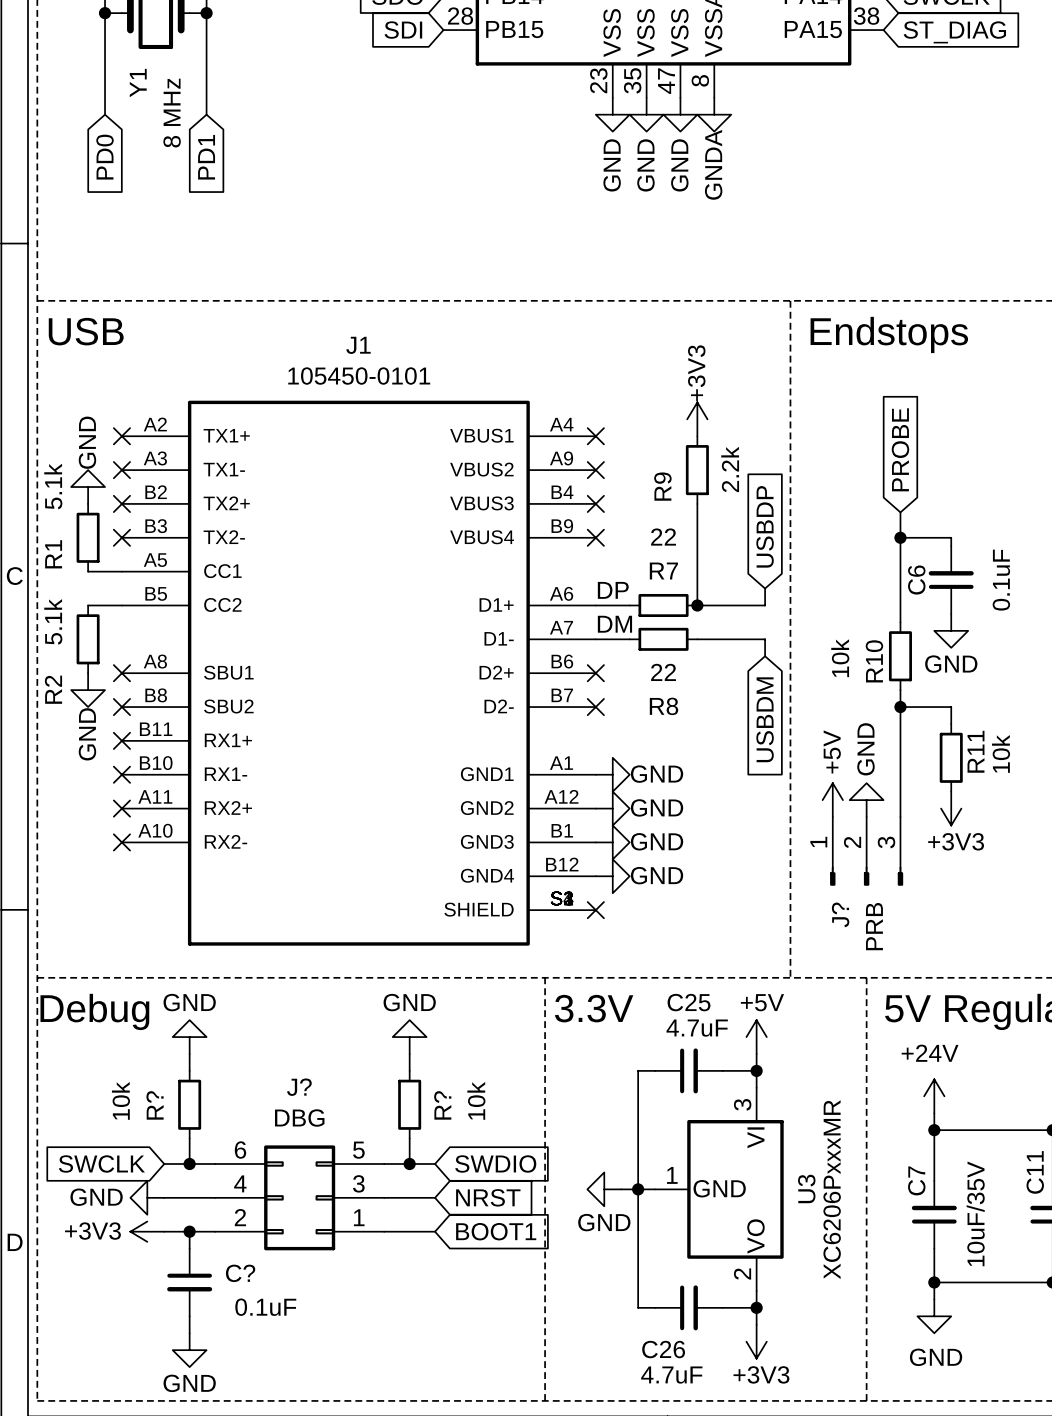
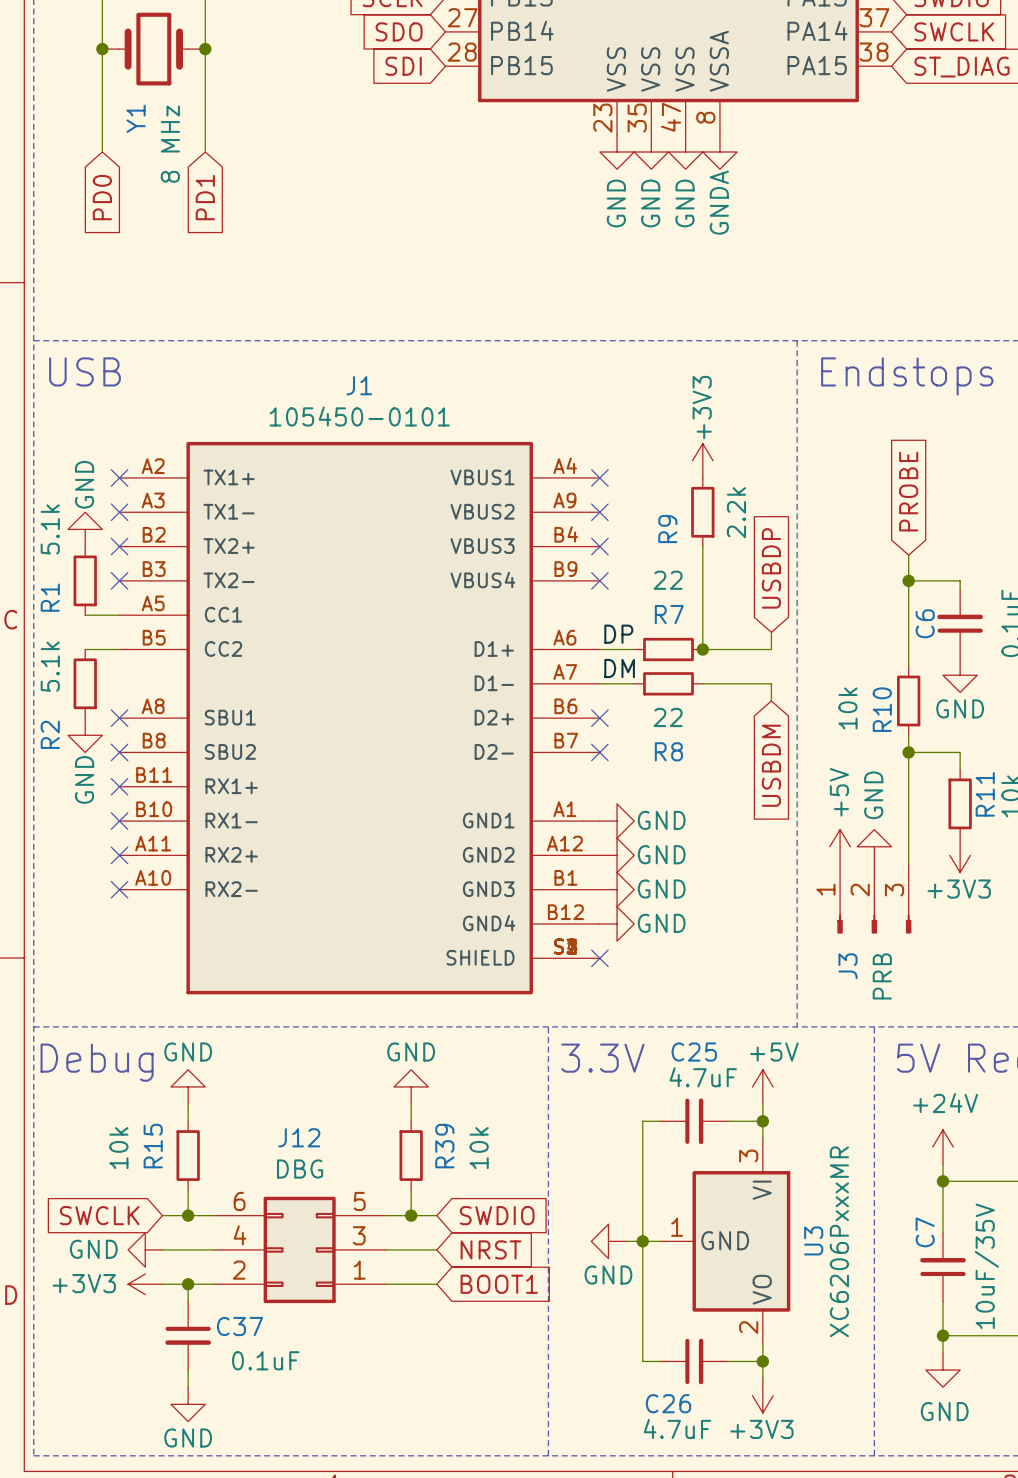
J? name: J? (840, 914) -> J3 (847, 966)
J? name: J? (299, 1087) -> J12 (299, 1137)
R? name: R? (155, 1105) -> R15 (153, 1146)
R? name: R? (442, 1105) -> R39 (444, 1146)
C? name: C? (240, 1273) -> C37 (240, 1326)

